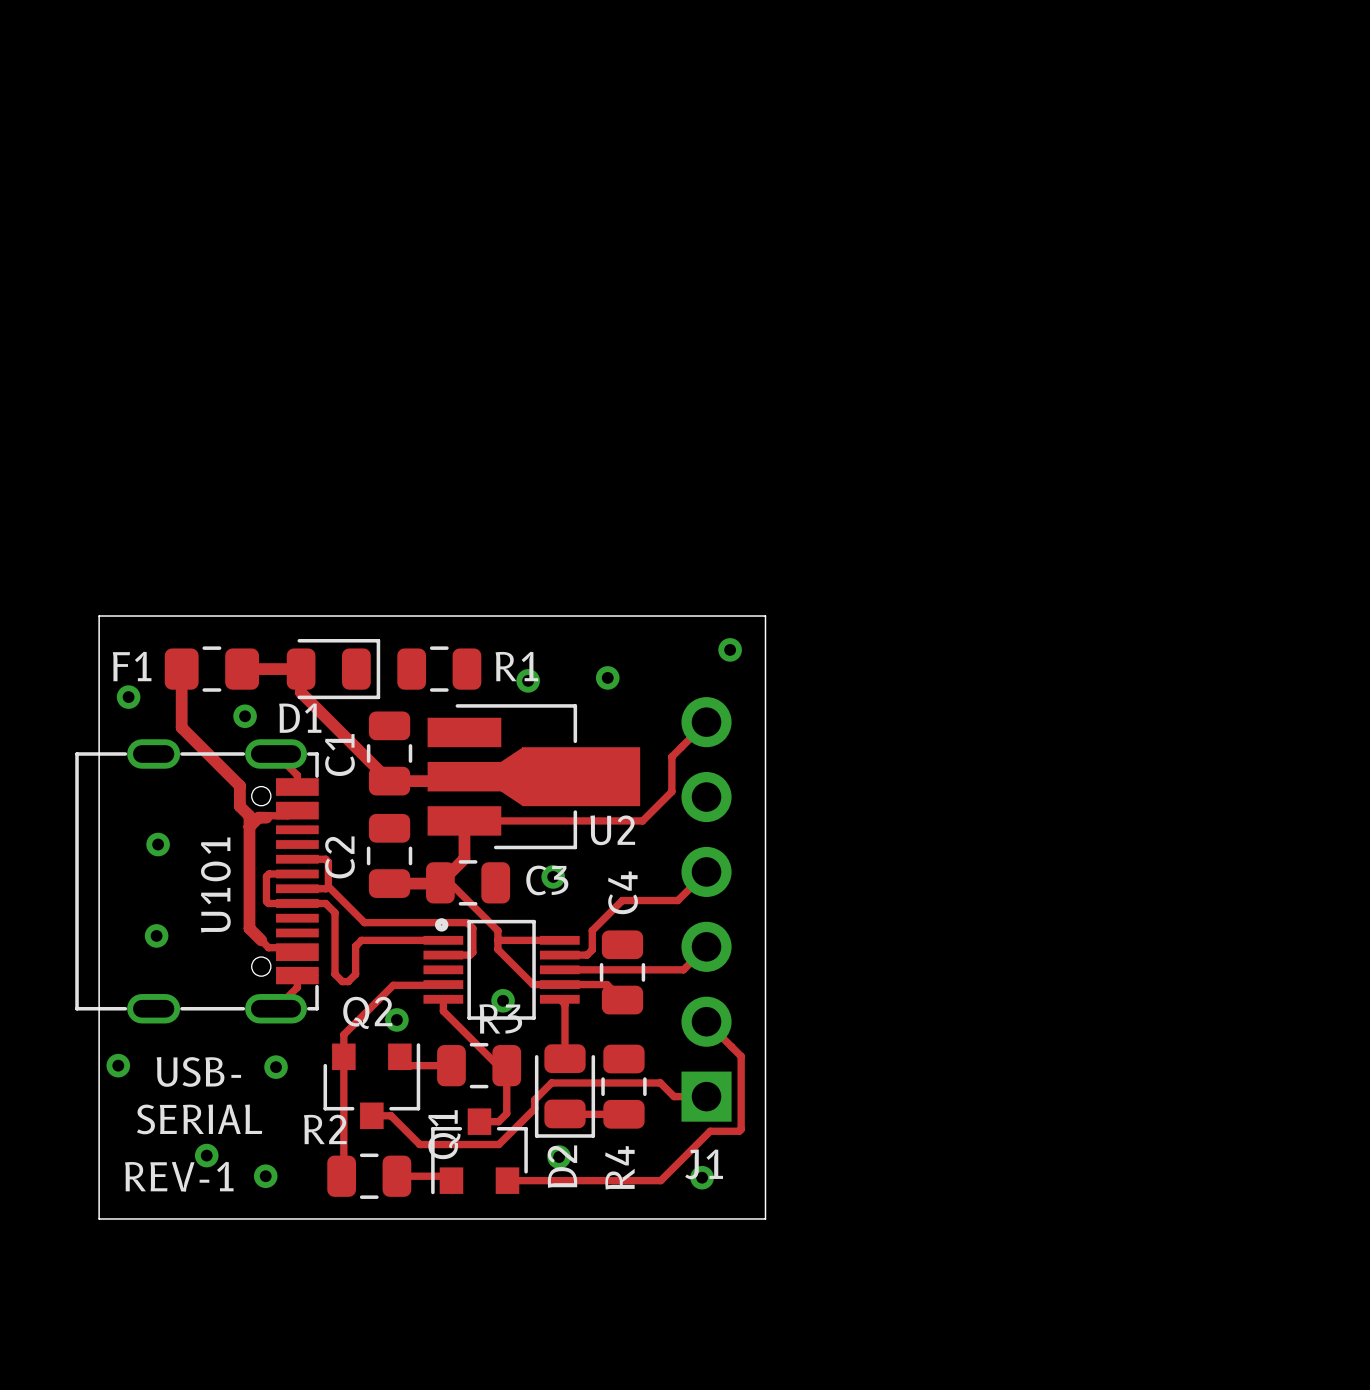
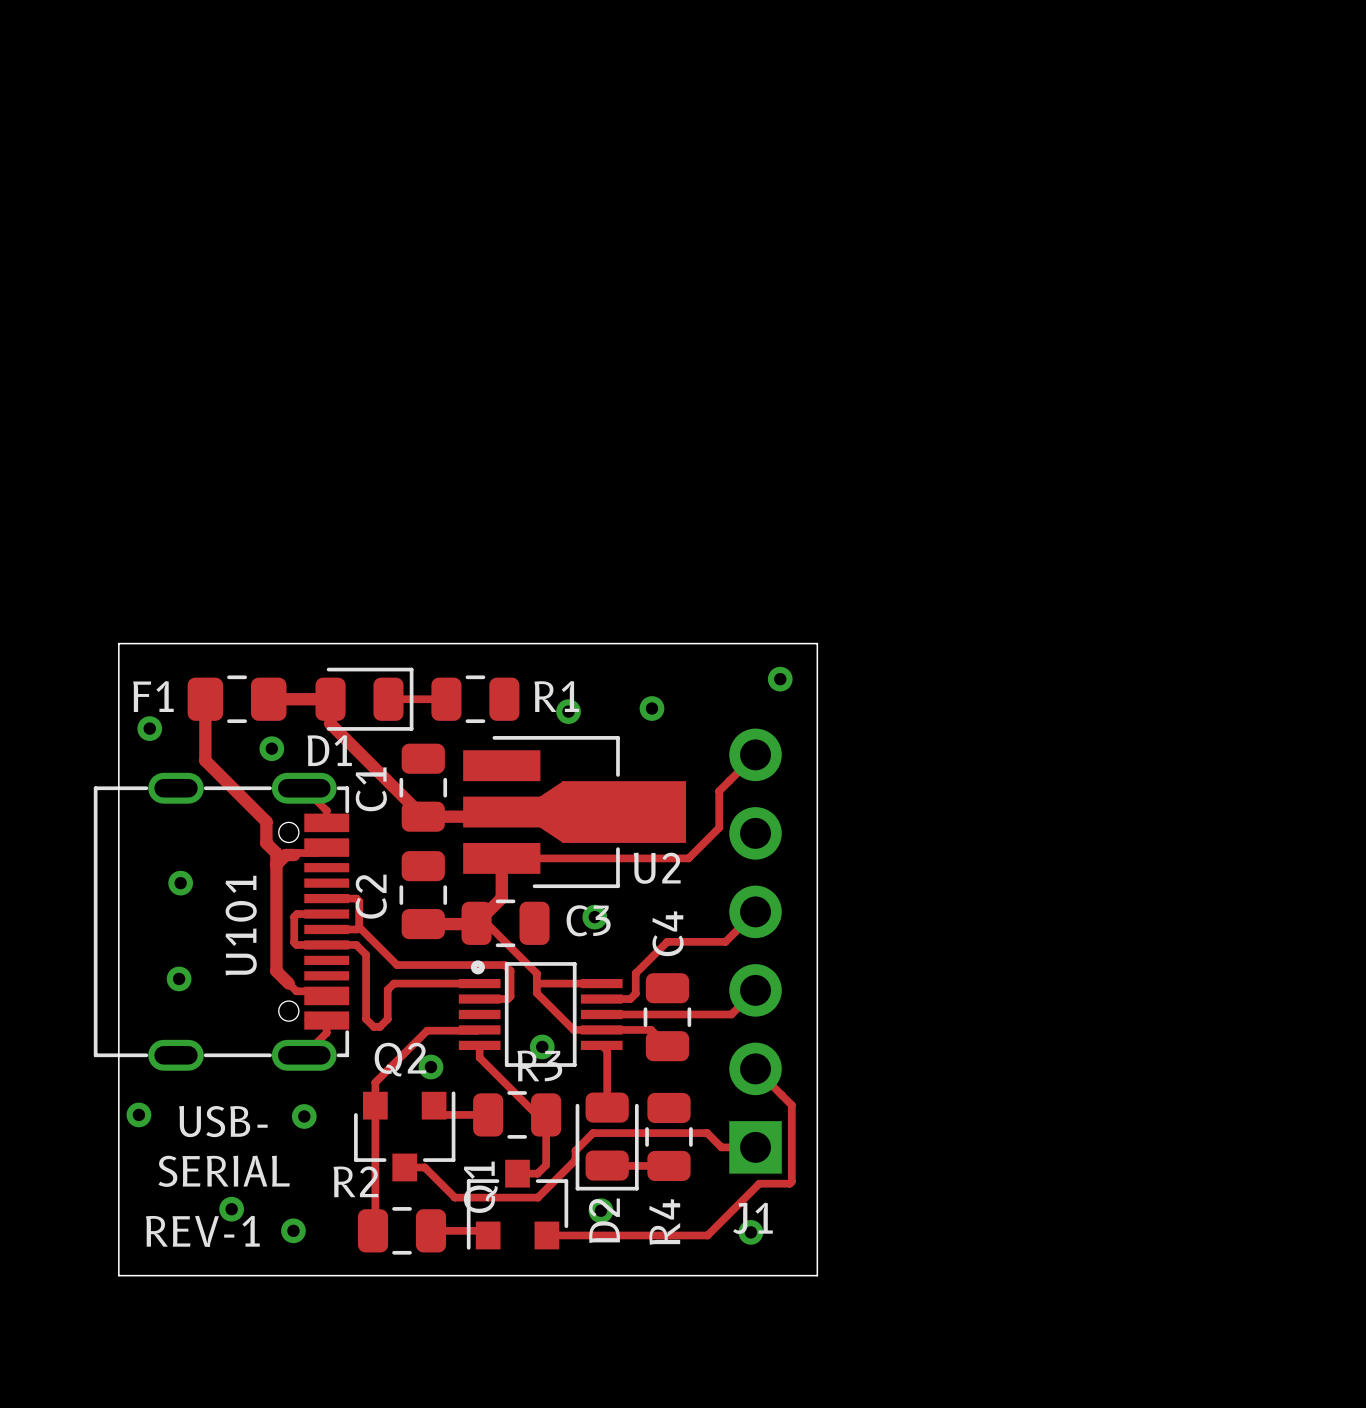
track: none -> (388, 699) (446, 699)

